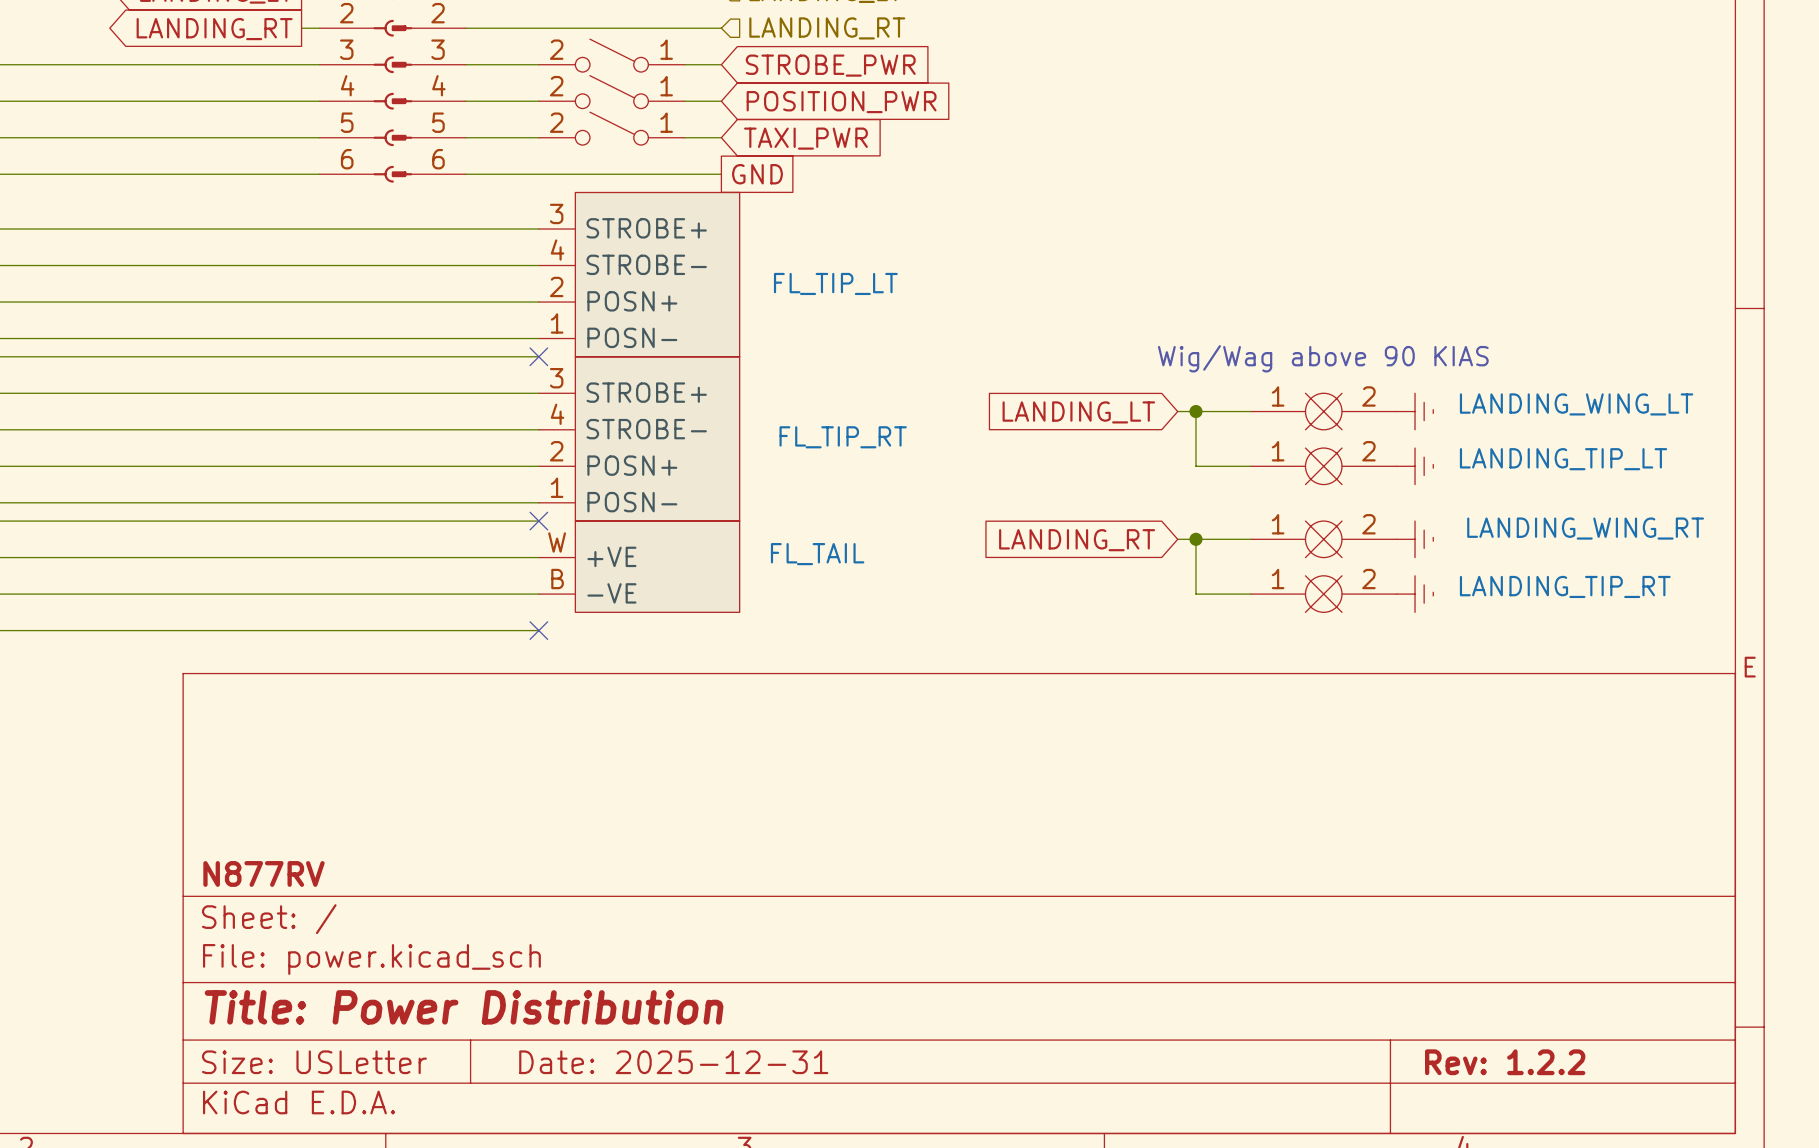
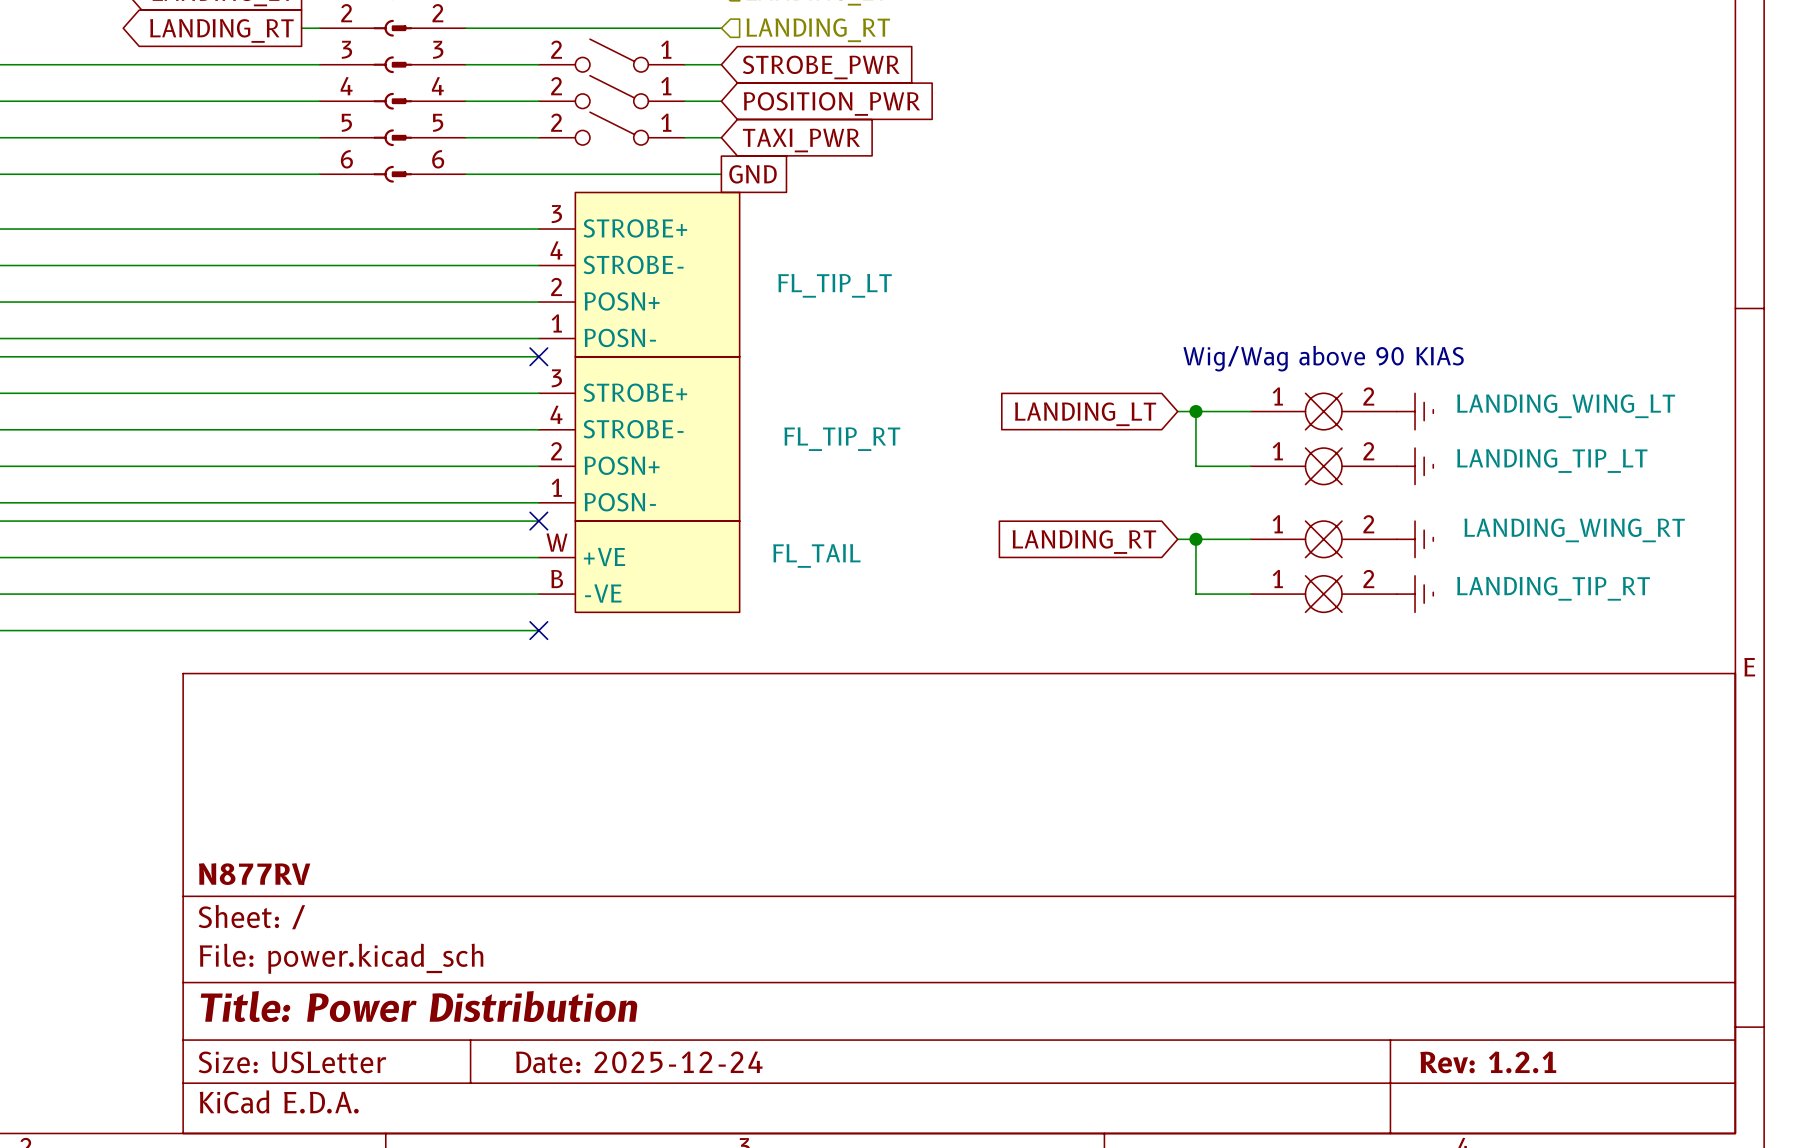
title block: Date: 2025-12-31 (673, 1062) -> Date: 2025-12-24 (639, 1062)
title block: Rev: 1.2.2 (1505, 1062) -> Rev: 1.2.1 (1488, 1062)

